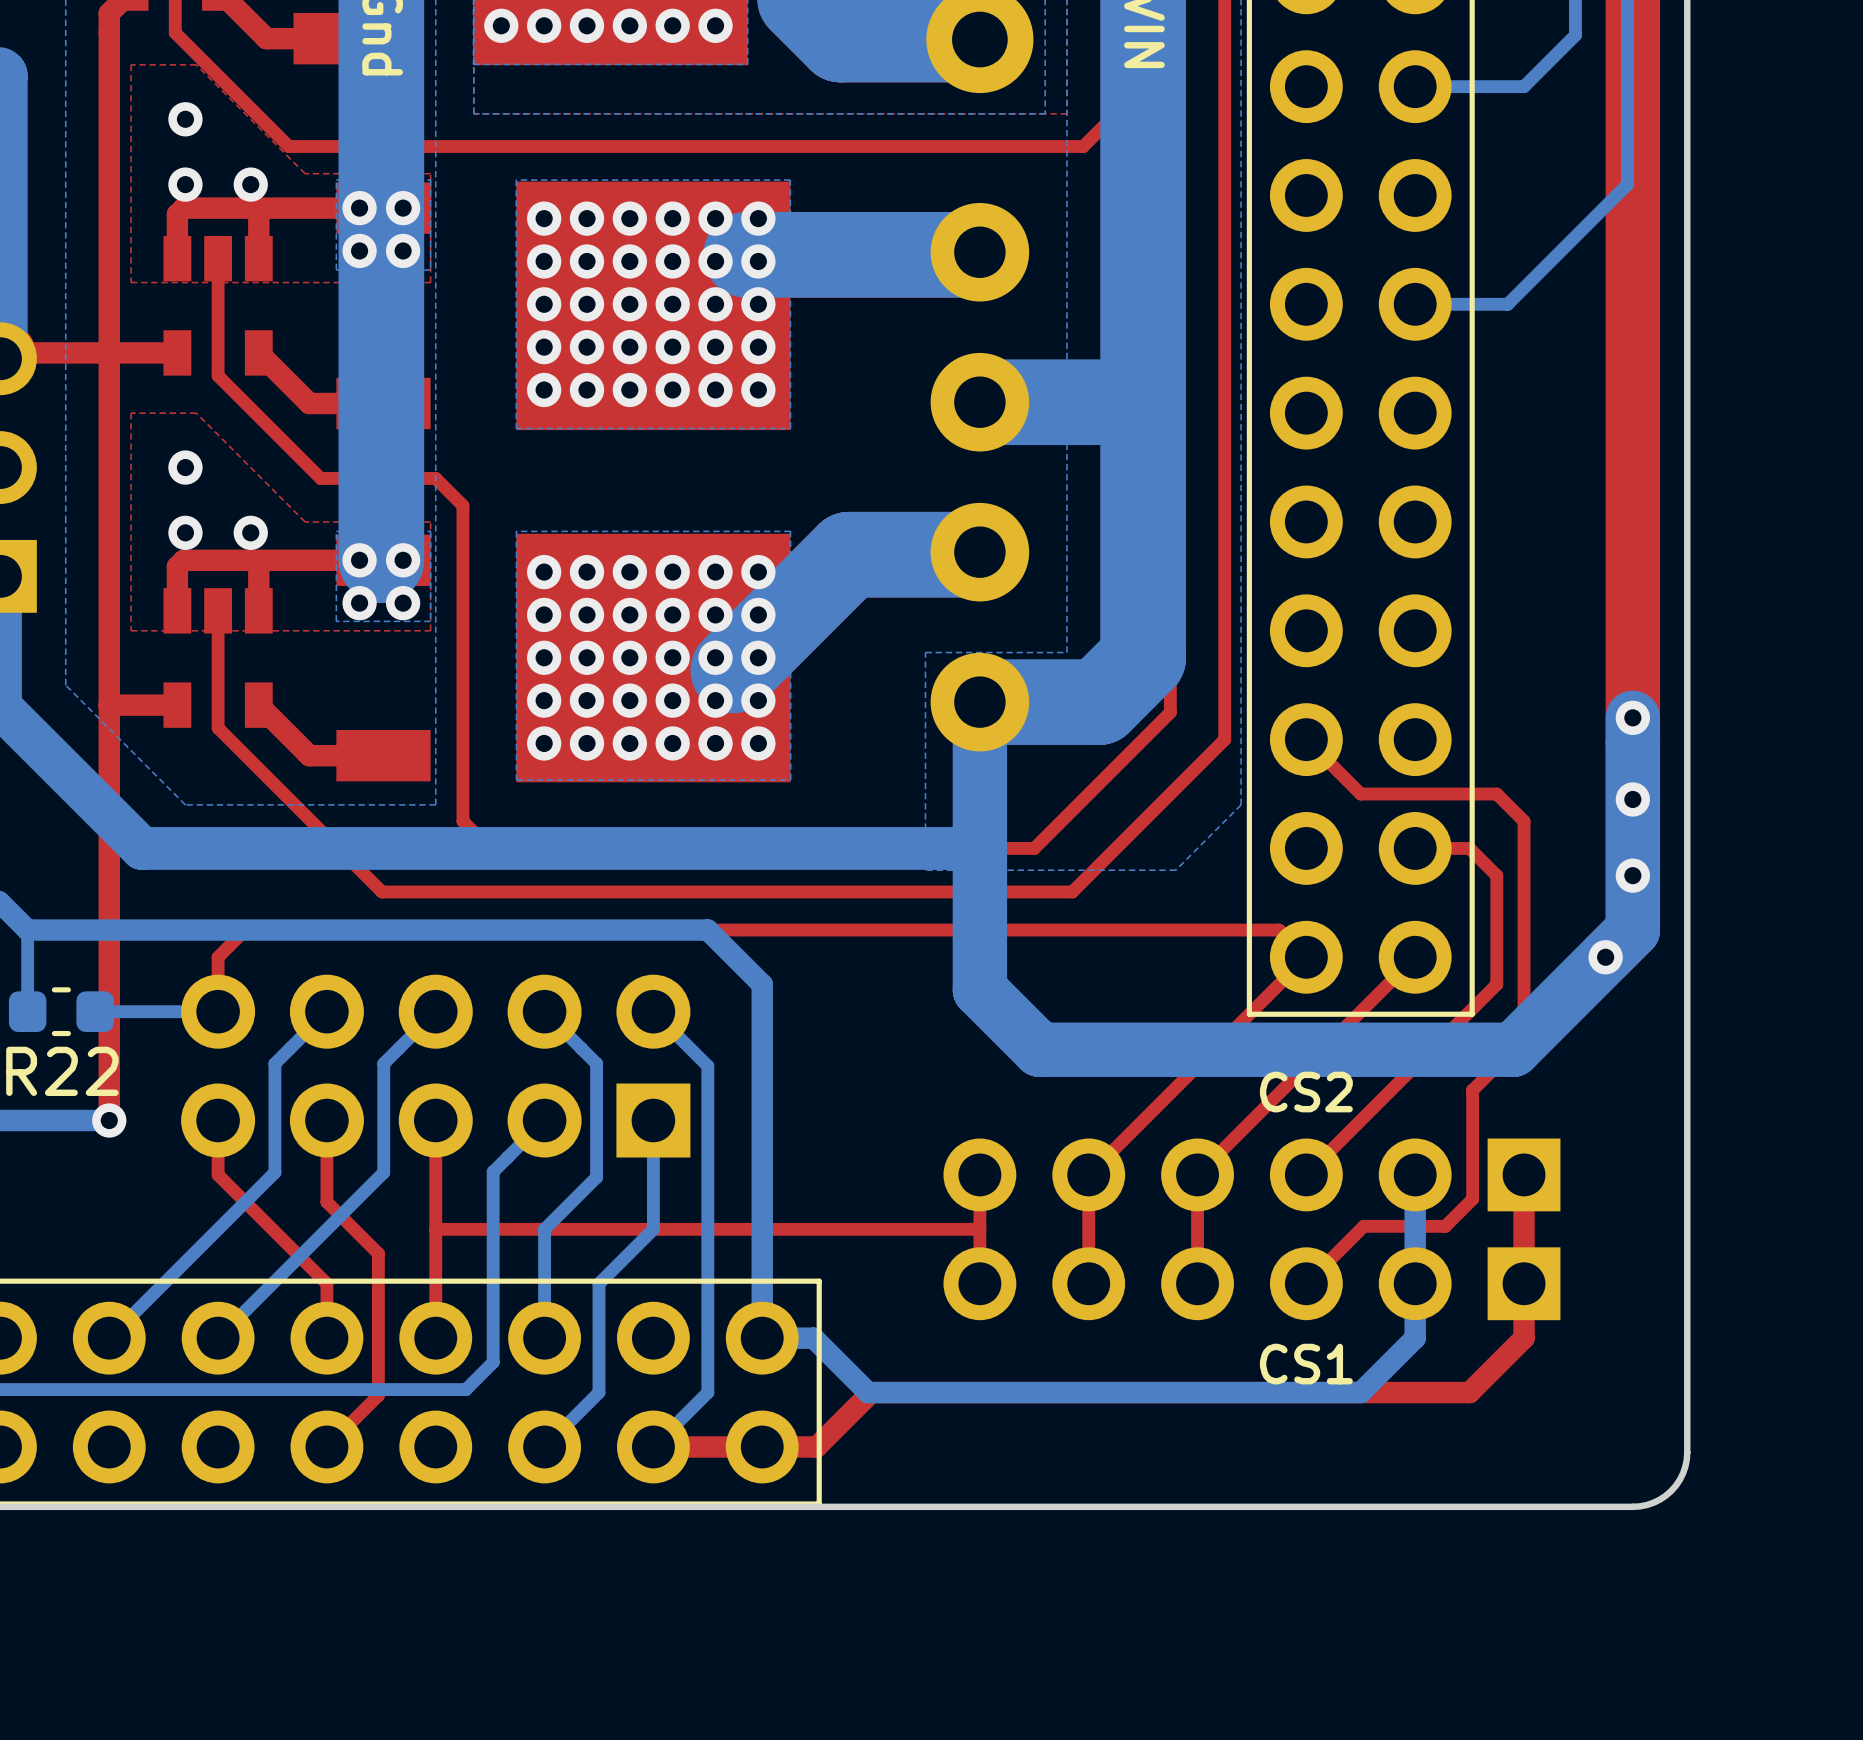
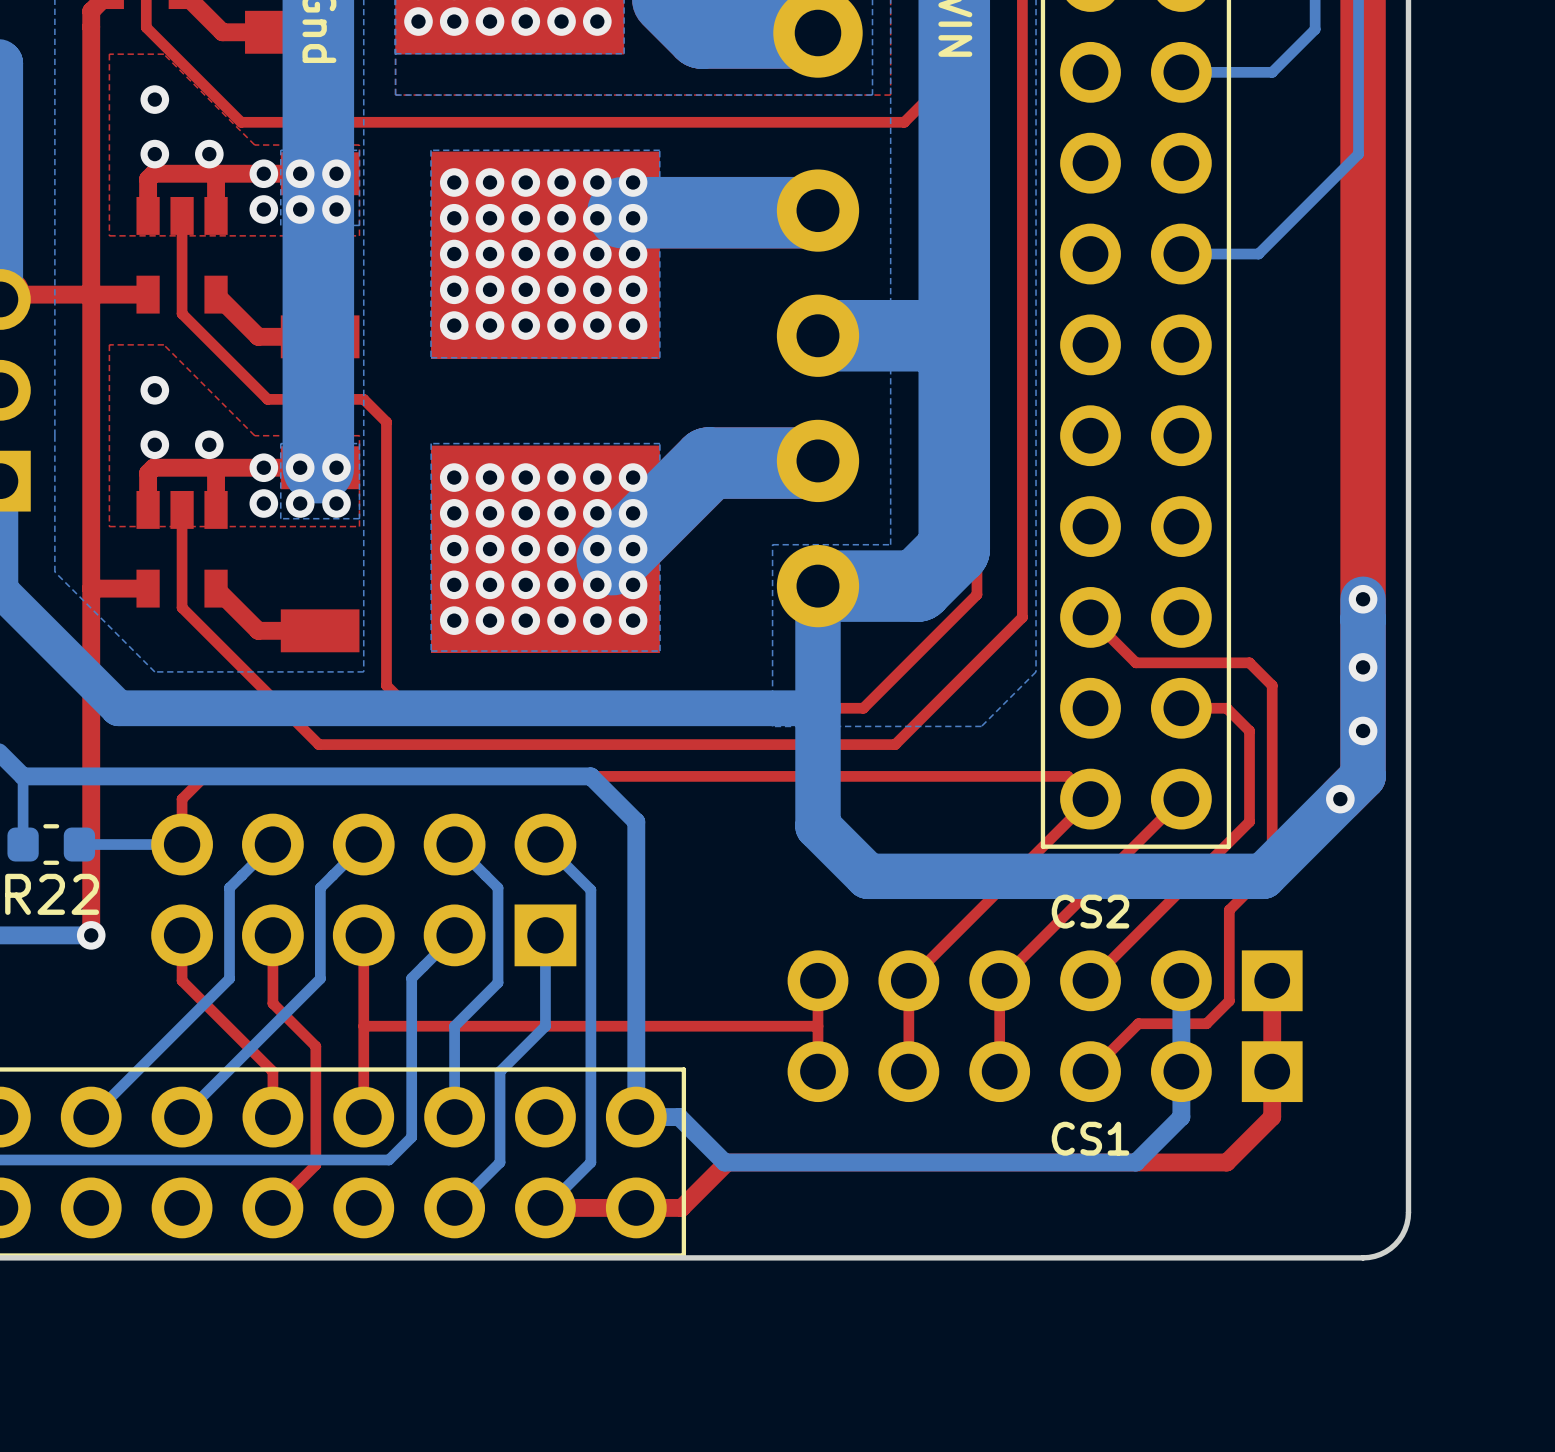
via: none -> (263, 173)
via: none -> (263, 209)
via: none -> (263, 467)
via: none -> (263, 503)

